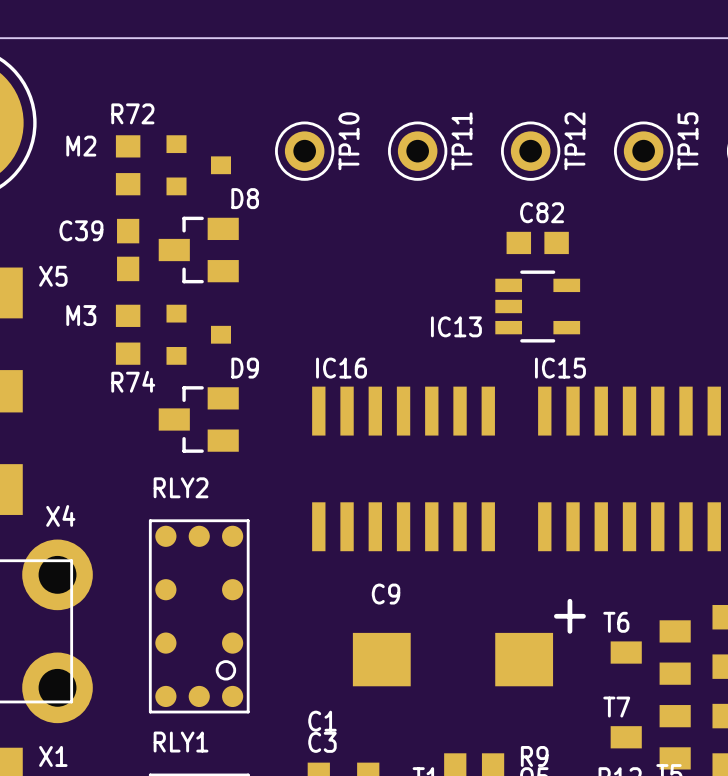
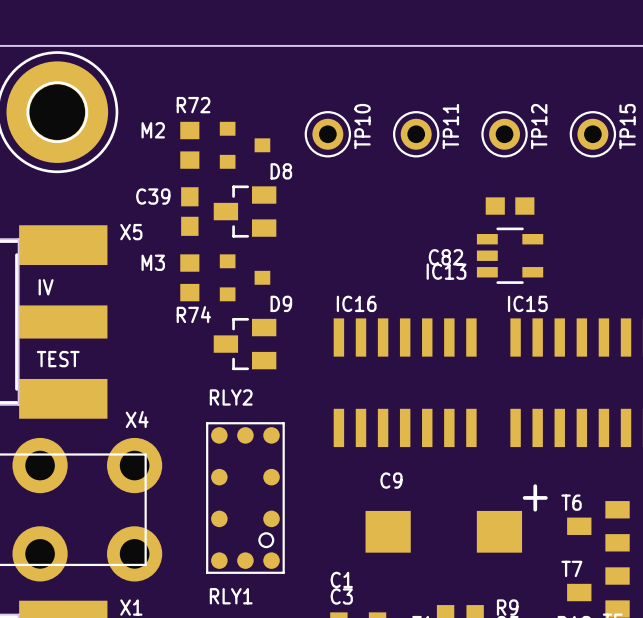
C82 name position: C82 (542, 212) -> C82 (445, 257)

